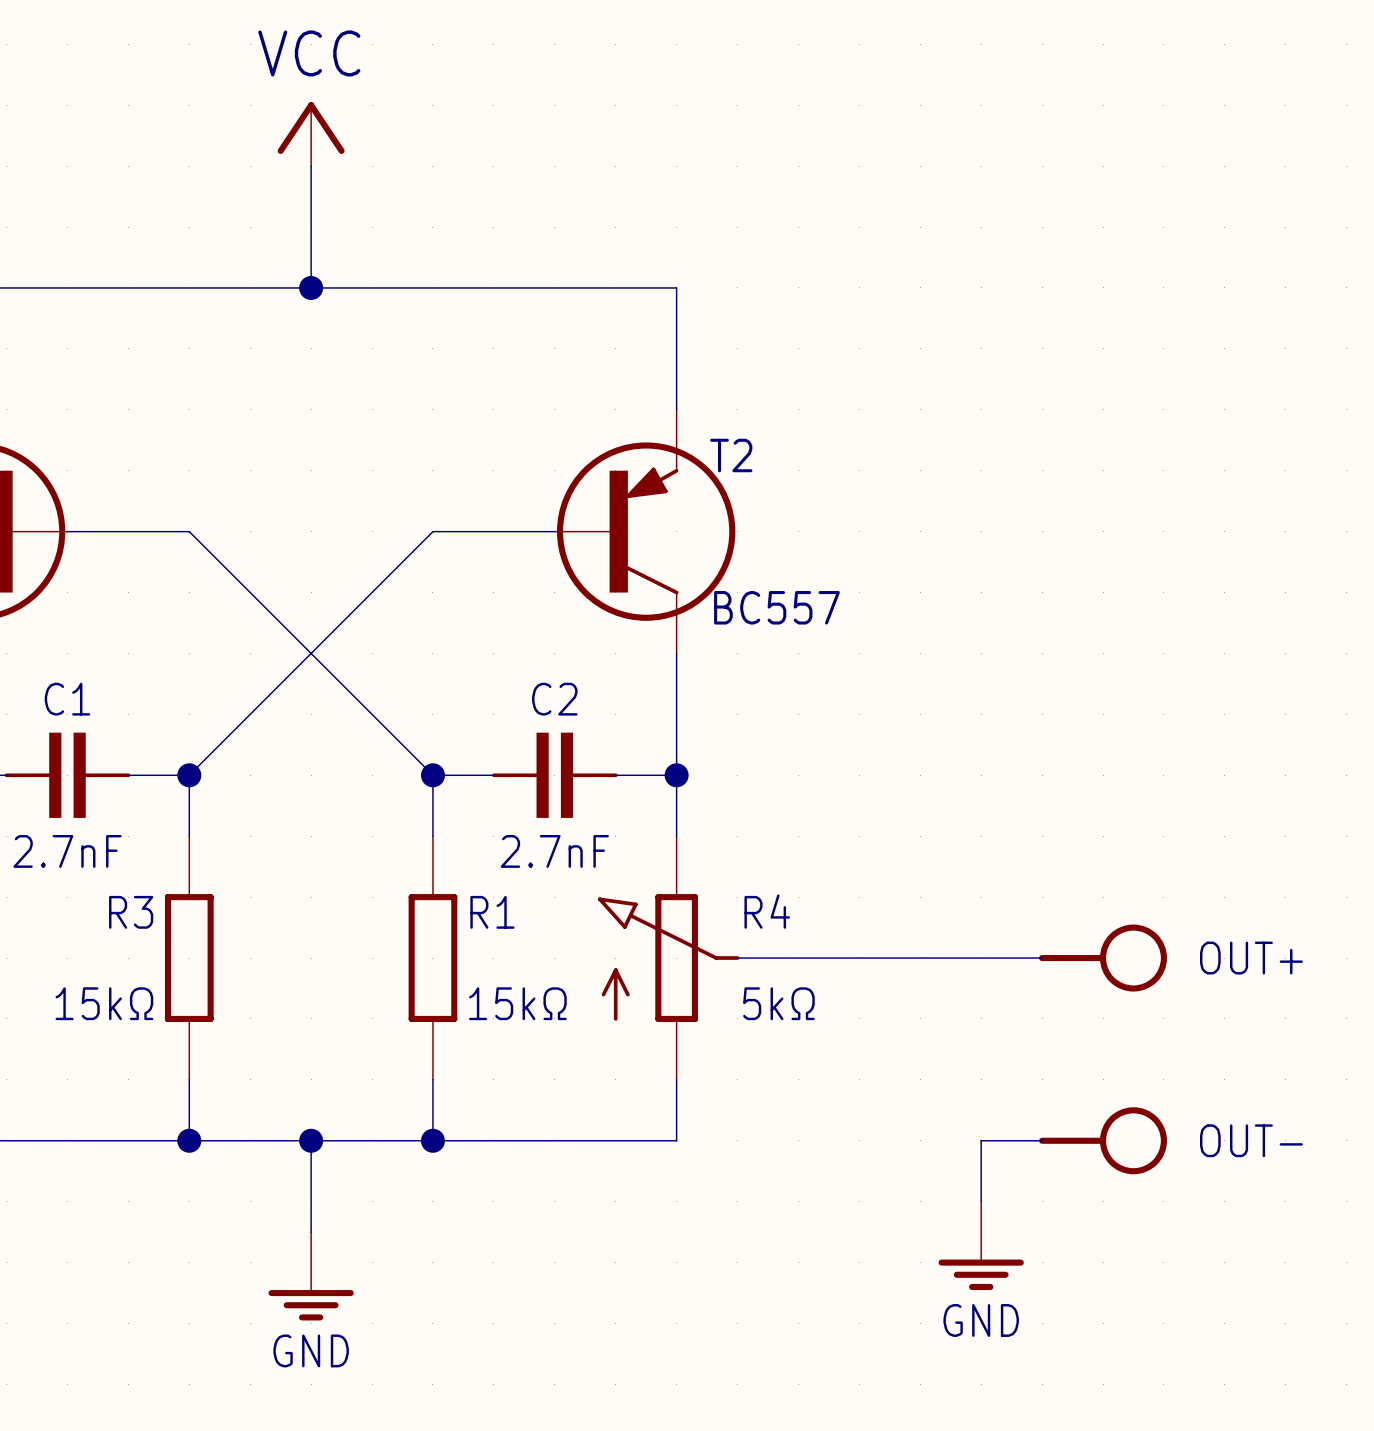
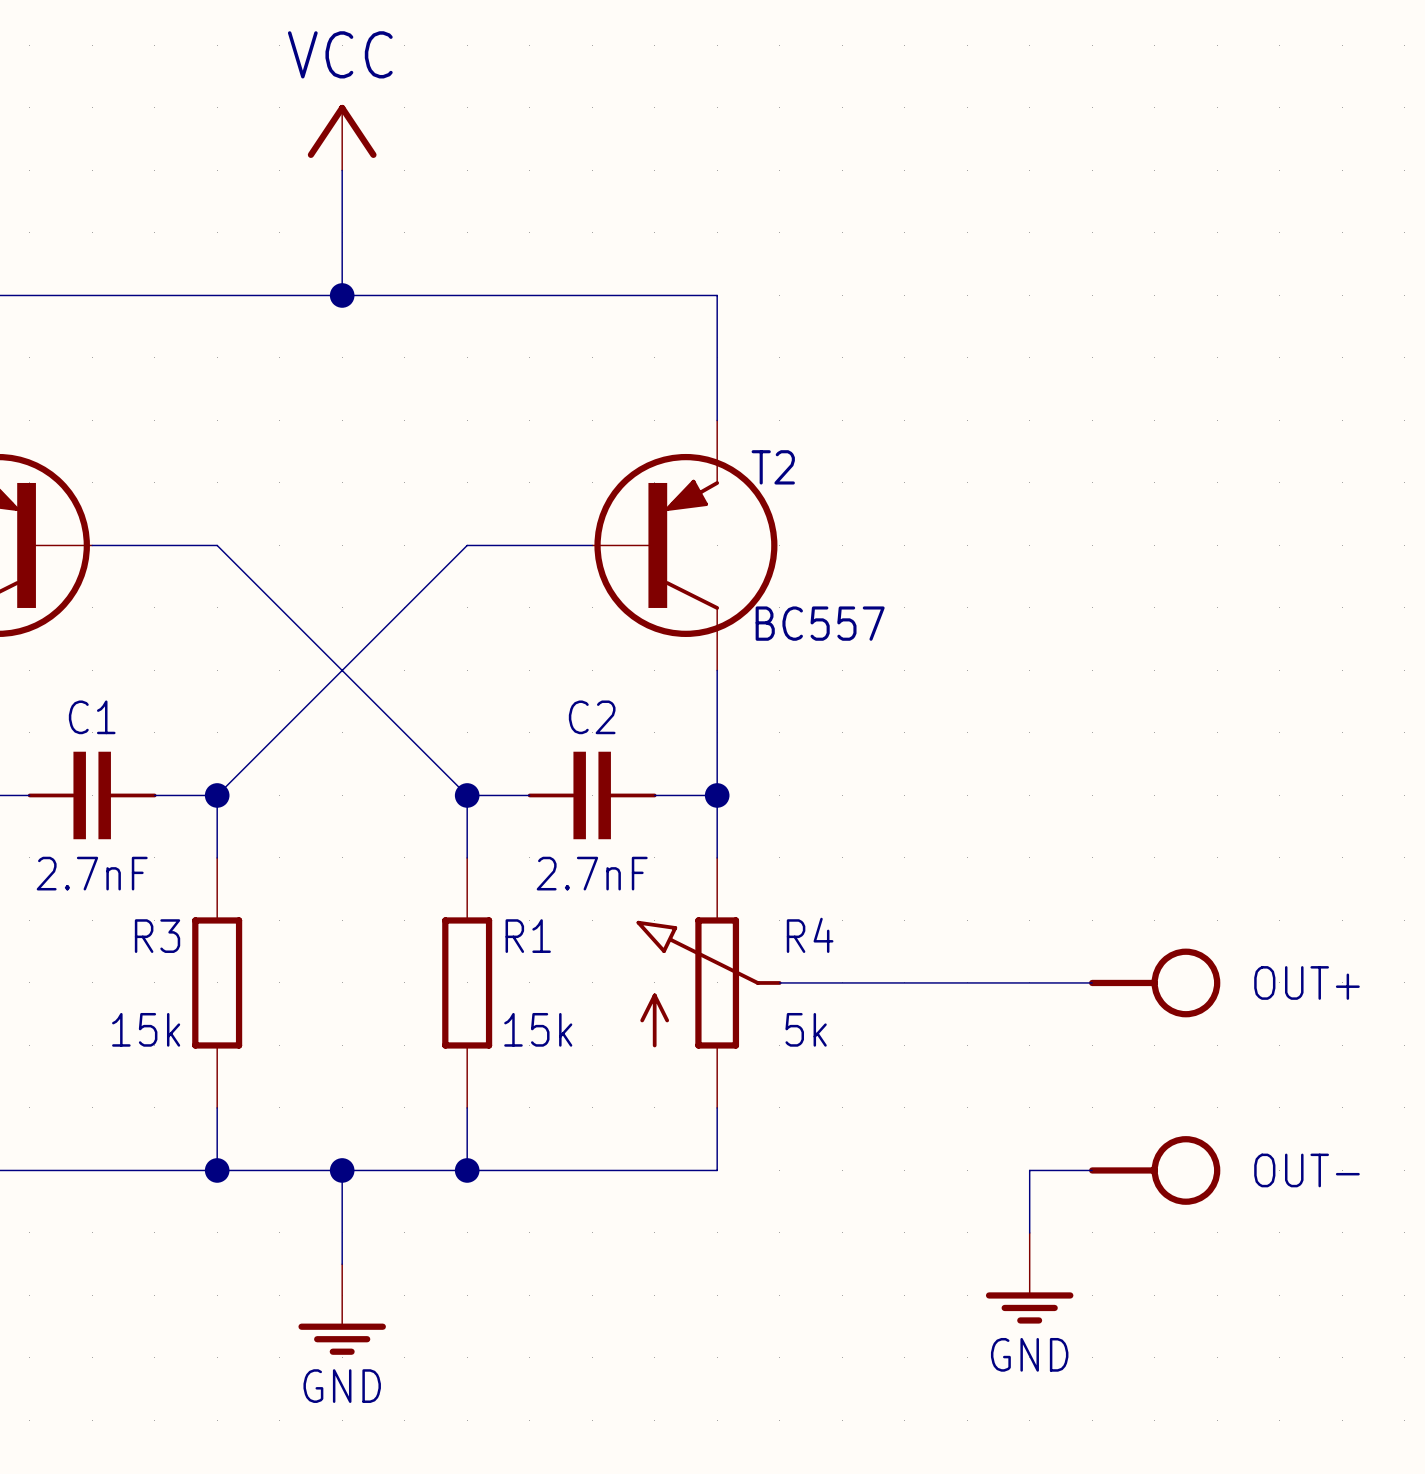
R3 value: 15kΩ (104, 1003) -> 15k (146, 1029)
R1 value: 15kΩ (517, 1003) -> 15k (538, 1029)
R4 value: 5kΩ (778, 1003) -> 5k (806, 1029)

